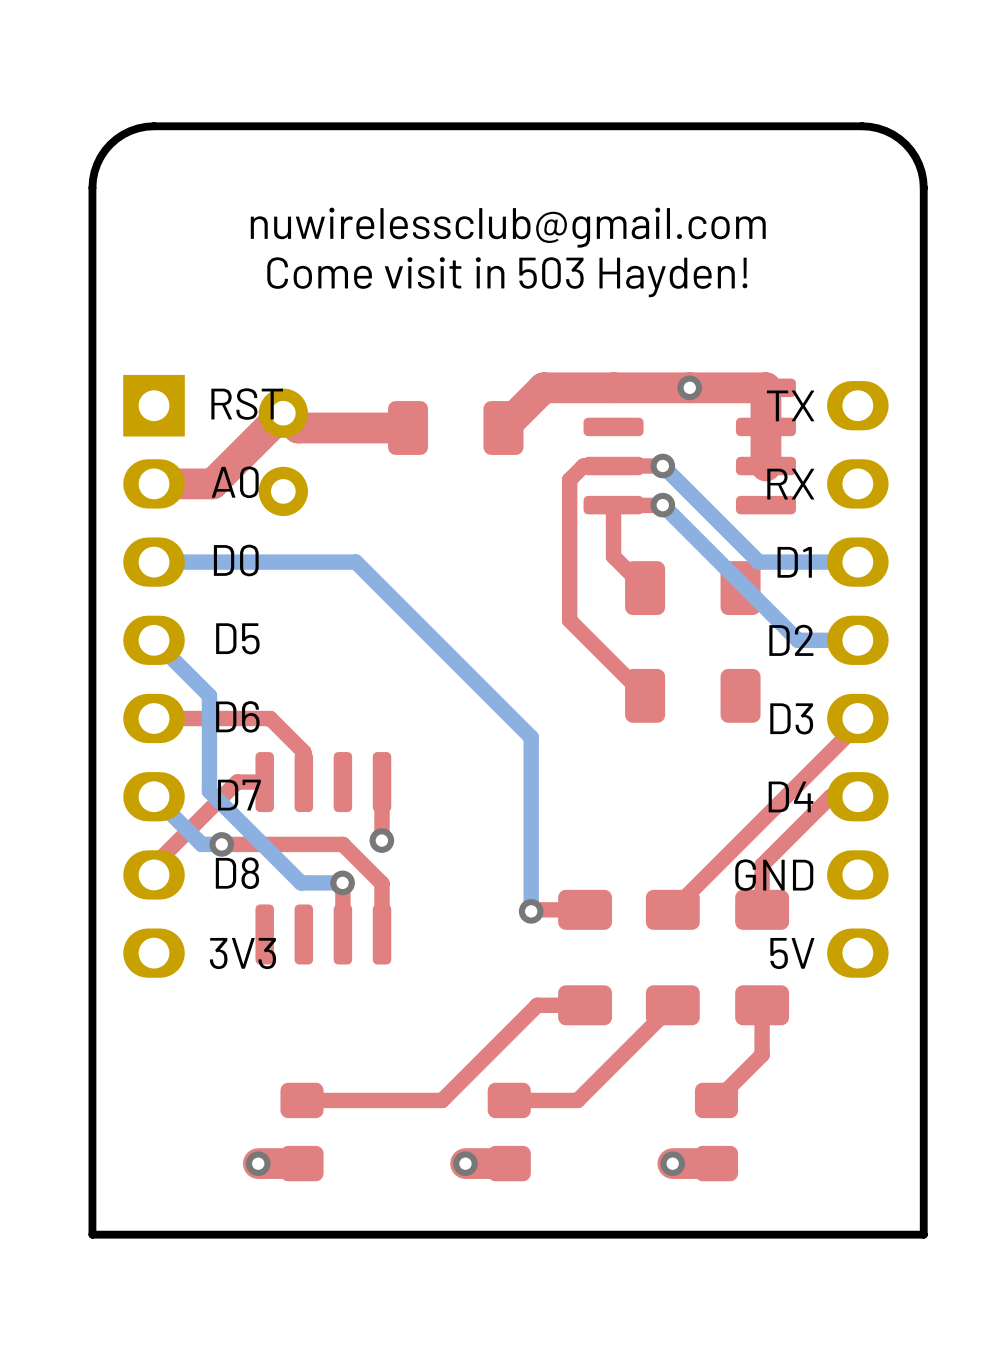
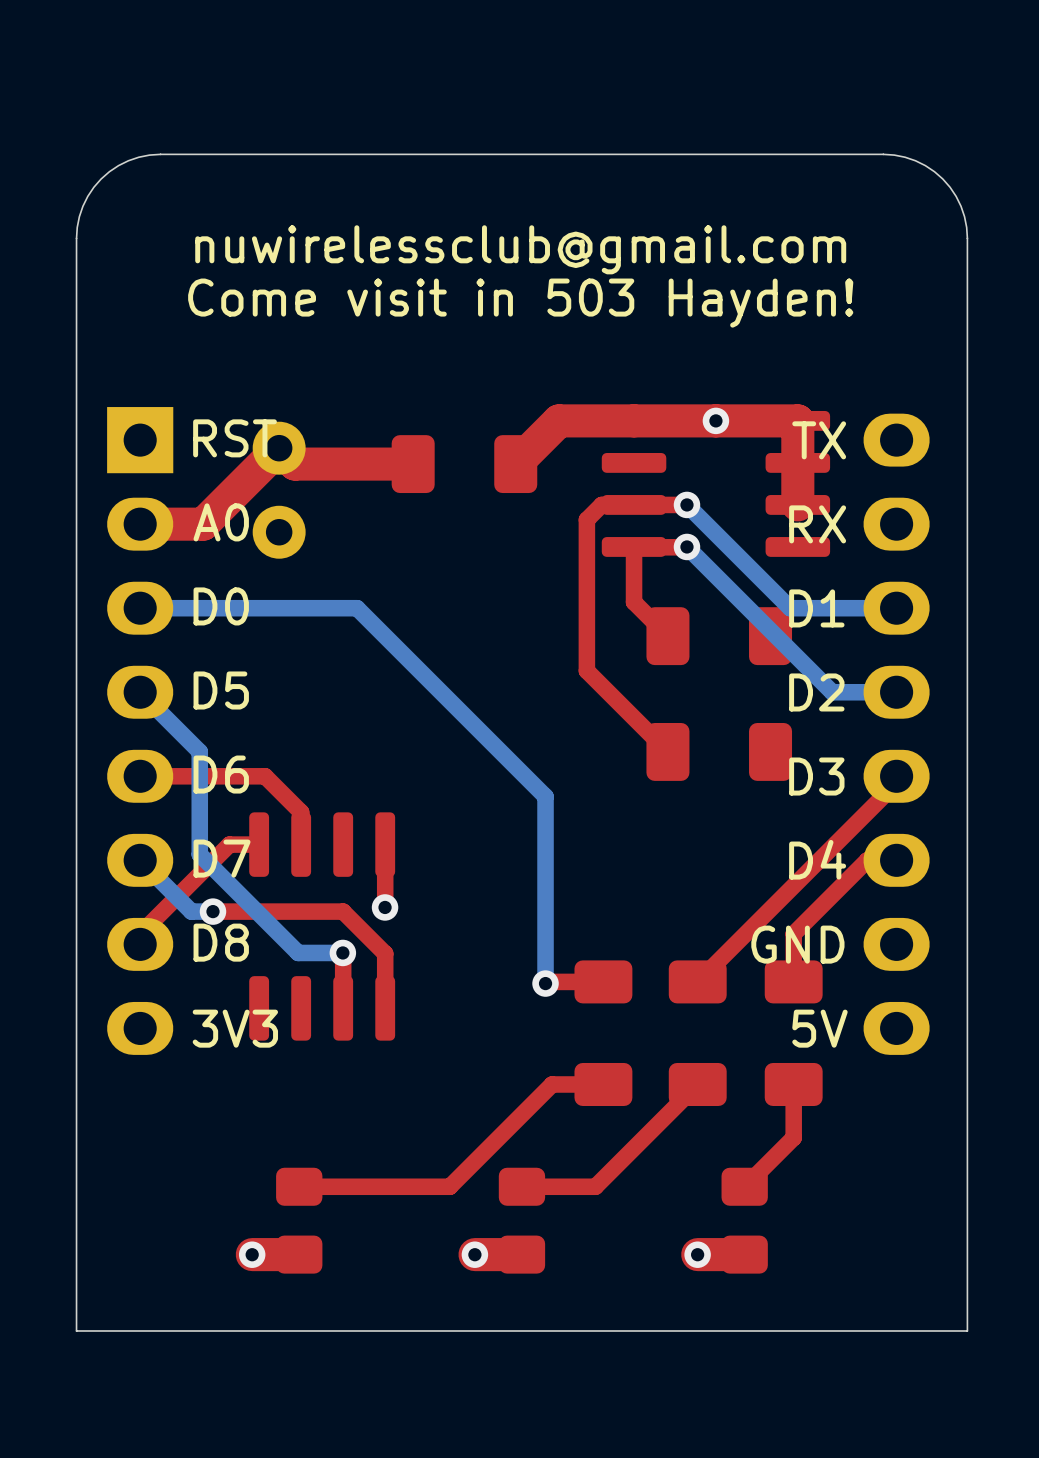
board edge: (923, 218) (923, 179) (915, 157) (905, 144) (892, 134) (870, 126) (154, 126) (130, 130) (116, 138) (105, 150) (94, 171) (92, 187) (92, 1234) (94, 1234) -> (967, 238) (961, 206) (942, 178) (915, 160) (883, 154) (160, 154) (138, 157) (118, 165) (93, 187) (79, 216) (76, 238) (76, 1330)
board edge width: thick (923, 218) (923, 1234) (94, 1234) -> thin (967, 238) (967, 1330) (76, 1330)

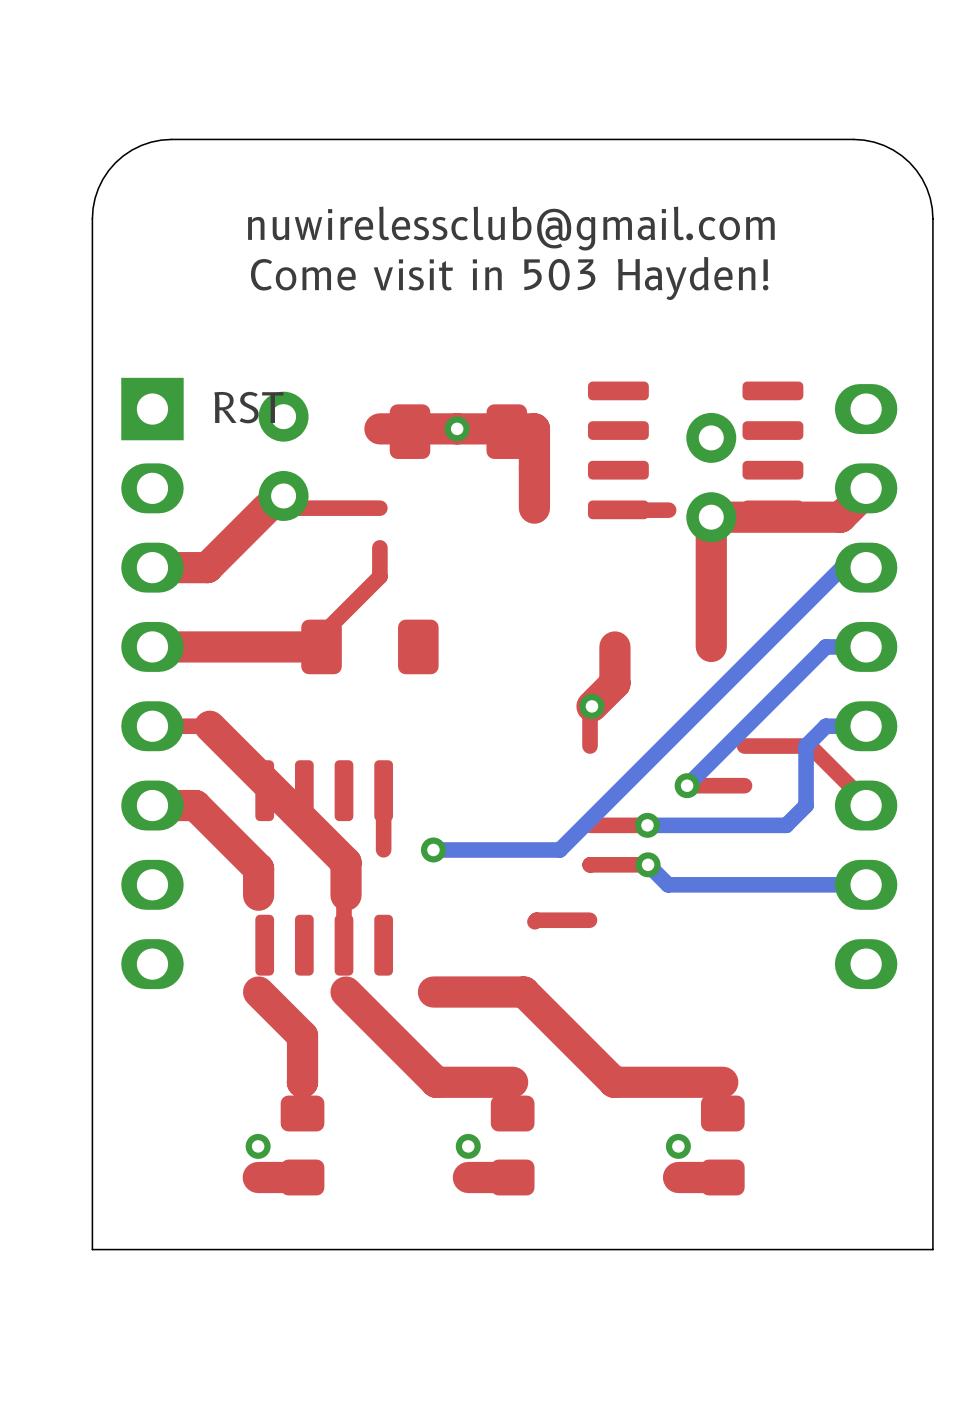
via: (715, 420) -> none
text: TX (819, 440) -> none
top track: none -> (379, 428) (534, 428) (534, 508)
via: none -> (457, 428)
top track: (413, 464) (295, 464) (279, 448) (203, 524) (140, 524) -> none
top track: (515, 464) (558, 420) (797, 420) (797, 504) -> none
top track: (686, 504) (601, 504) (586, 519) (586, 670) (667, 751) -> none
bottom track: (686, 504) (790, 608) (871, 608) -> (433, 849) (559, 849) (842, 567)
via: (686, 504) -> none
part: none -> (711, 477)
text: A0 (221, 522) -> none
text: RX (817, 524) -> none
top track: none -> (869, 488) (840, 517) (711, 517) (711, 646)
top track: none -> (266, 508) (207, 567) (155, 567)
top track: none -> (379, 508) (266, 508)
top track: (634, 546) (634, 602) (667, 636) -> none
bottom track: (686, 546) (832, 692) (853, 692) -> (687, 785) (825, 646)
via: (686, 546) -> none
top track: none -> (379, 547) (379, 576) (321, 635) (321, 646) (155, 646)
text: D0 (221, 606) -> none
bottom track: (140, 608) (357, 608) (545, 796) (545, 983) -> none
text: D1 (816, 608) -> none
part: (719, 636) -> none
text: D5 (221, 690) -> none
bottom track: (140, 692) (199, 751) (199, 854) (298, 952) (342, 952) -> none
part: none -> (369, 646)
top track: none -> (614, 646) (614, 683) (590, 708) (590, 746)
text: D2 (816, 692) -> none
part: (719, 751) -> none
via: none -> (591, 706)
text: D6 (221, 774) -> none
top track: (200, 776) (265, 776) (301, 812) (301, 844) -> (209, 726) (346, 862) (346, 895)
text: D3 (816, 776) -> none
top track: (896, 776) (896, 783) (697, 981) -> none
bottom track: none -> (869, 726) (825, 726) (806, 746) (806, 805) (786, 825) (647, 825)
top track: none -> (744, 746) (810, 746) (869, 805)
via: none -> (687, 785)
top track: none -> (744, 785) (687, 785)
top track: (259, 844) (229, 844) (140, 933) (140, 944) -> none
text: D7 (222, 858) -> none
text: D4 (817, 859) -> none
bottom track: (140, 860) (191, 911) (212, 911) -> none
top track: none -> (155, 805) (195, 805) (258, 868) (258, 895)
top track: (896, 860) (867, 860) (793, 933) (793, 981) -> none
top track: none -> (647, 825) (590, 825)
via: none -> (647, 825)
via: (385, 907) -> none
via: none -> (433, 849)
top track: (212, 911) (343, 911) (385, 953) (385, 1008) -> none
via: (212, 911) -> none
top track: none -> (648, 864) (590, 864)
bottom track: none -> (648, 864) (668, 884) (869, 884)
via: none -> (648, 864)
text: D8 (221, 942) -> none
text: GND (797, 944) -> none
via: (342, 952) -> none
via: (545, 983) -> none
text: 3V3 (235, 1028) -> none
text: 5V (819, 1028) -> none
part: (603, 1033) -> none
part: (697, 1033) -> none
part: (793, 1033) -> none
top track: none -> (258, 992) (302, 1035) (302, 1082)
top track: none -> (346, 992) (436, 1082) (512, 1082)
top track: none -> (433, 992) (523, 992) (614, 1082) (722, 1082)
top track: (603, 1084) (552, 1084) (449, 1186) (299, 1186) -> none
top track: (697, 1084) (595, 1186) (521, 1186) -> none
top track: (793, 1084) (793, 1137) (744, 1186) -> none
via position: (252, 1254) -> (258, 1146)
via position: (474, 1254) -> (468, 1146)
via position: (697, 1254) -> (678, 1146)

